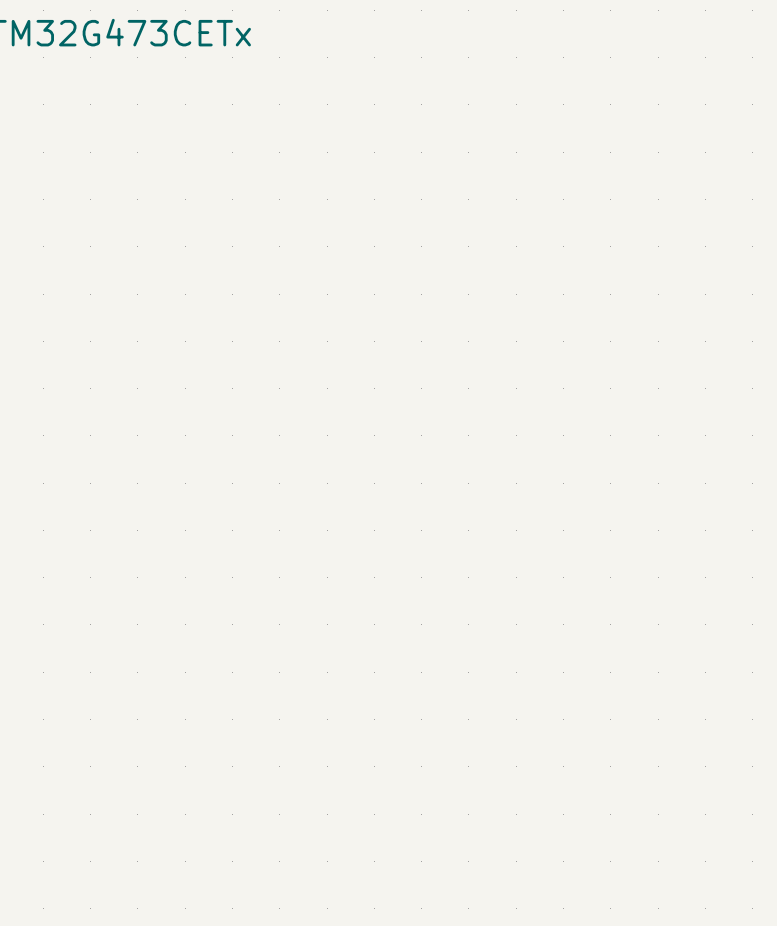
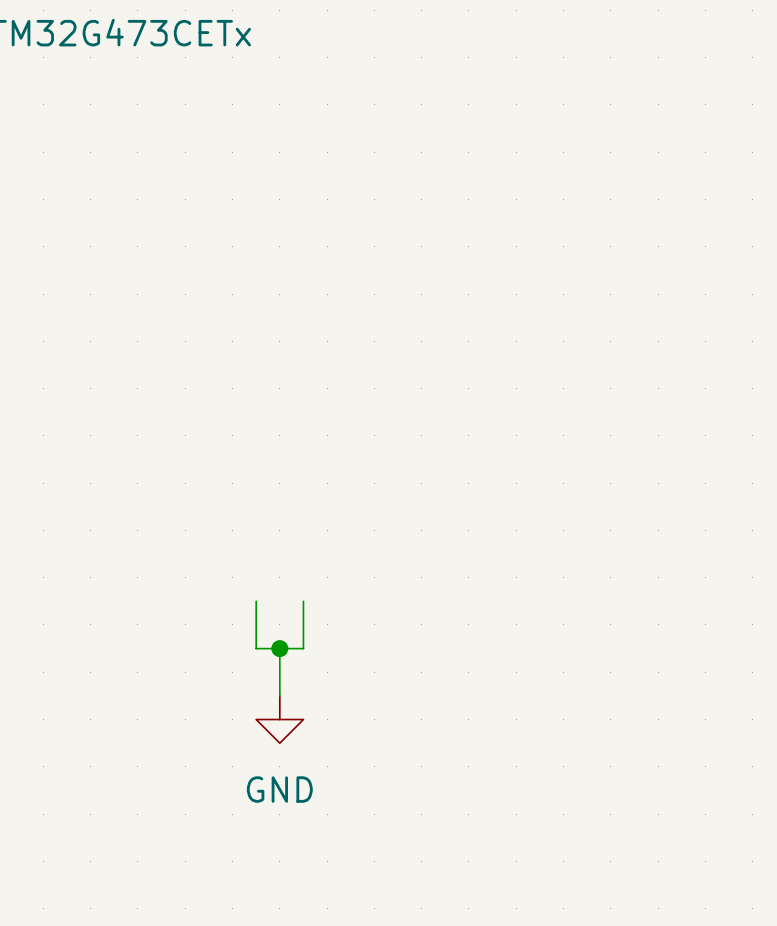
wire: none -> (256, 601) (256, 648) (303, 648) (303, 601)
wire: none -> (279, 648) (279, 695)
junction: none -> (279, 648)
power symbol: none -> GND (279, 719)

